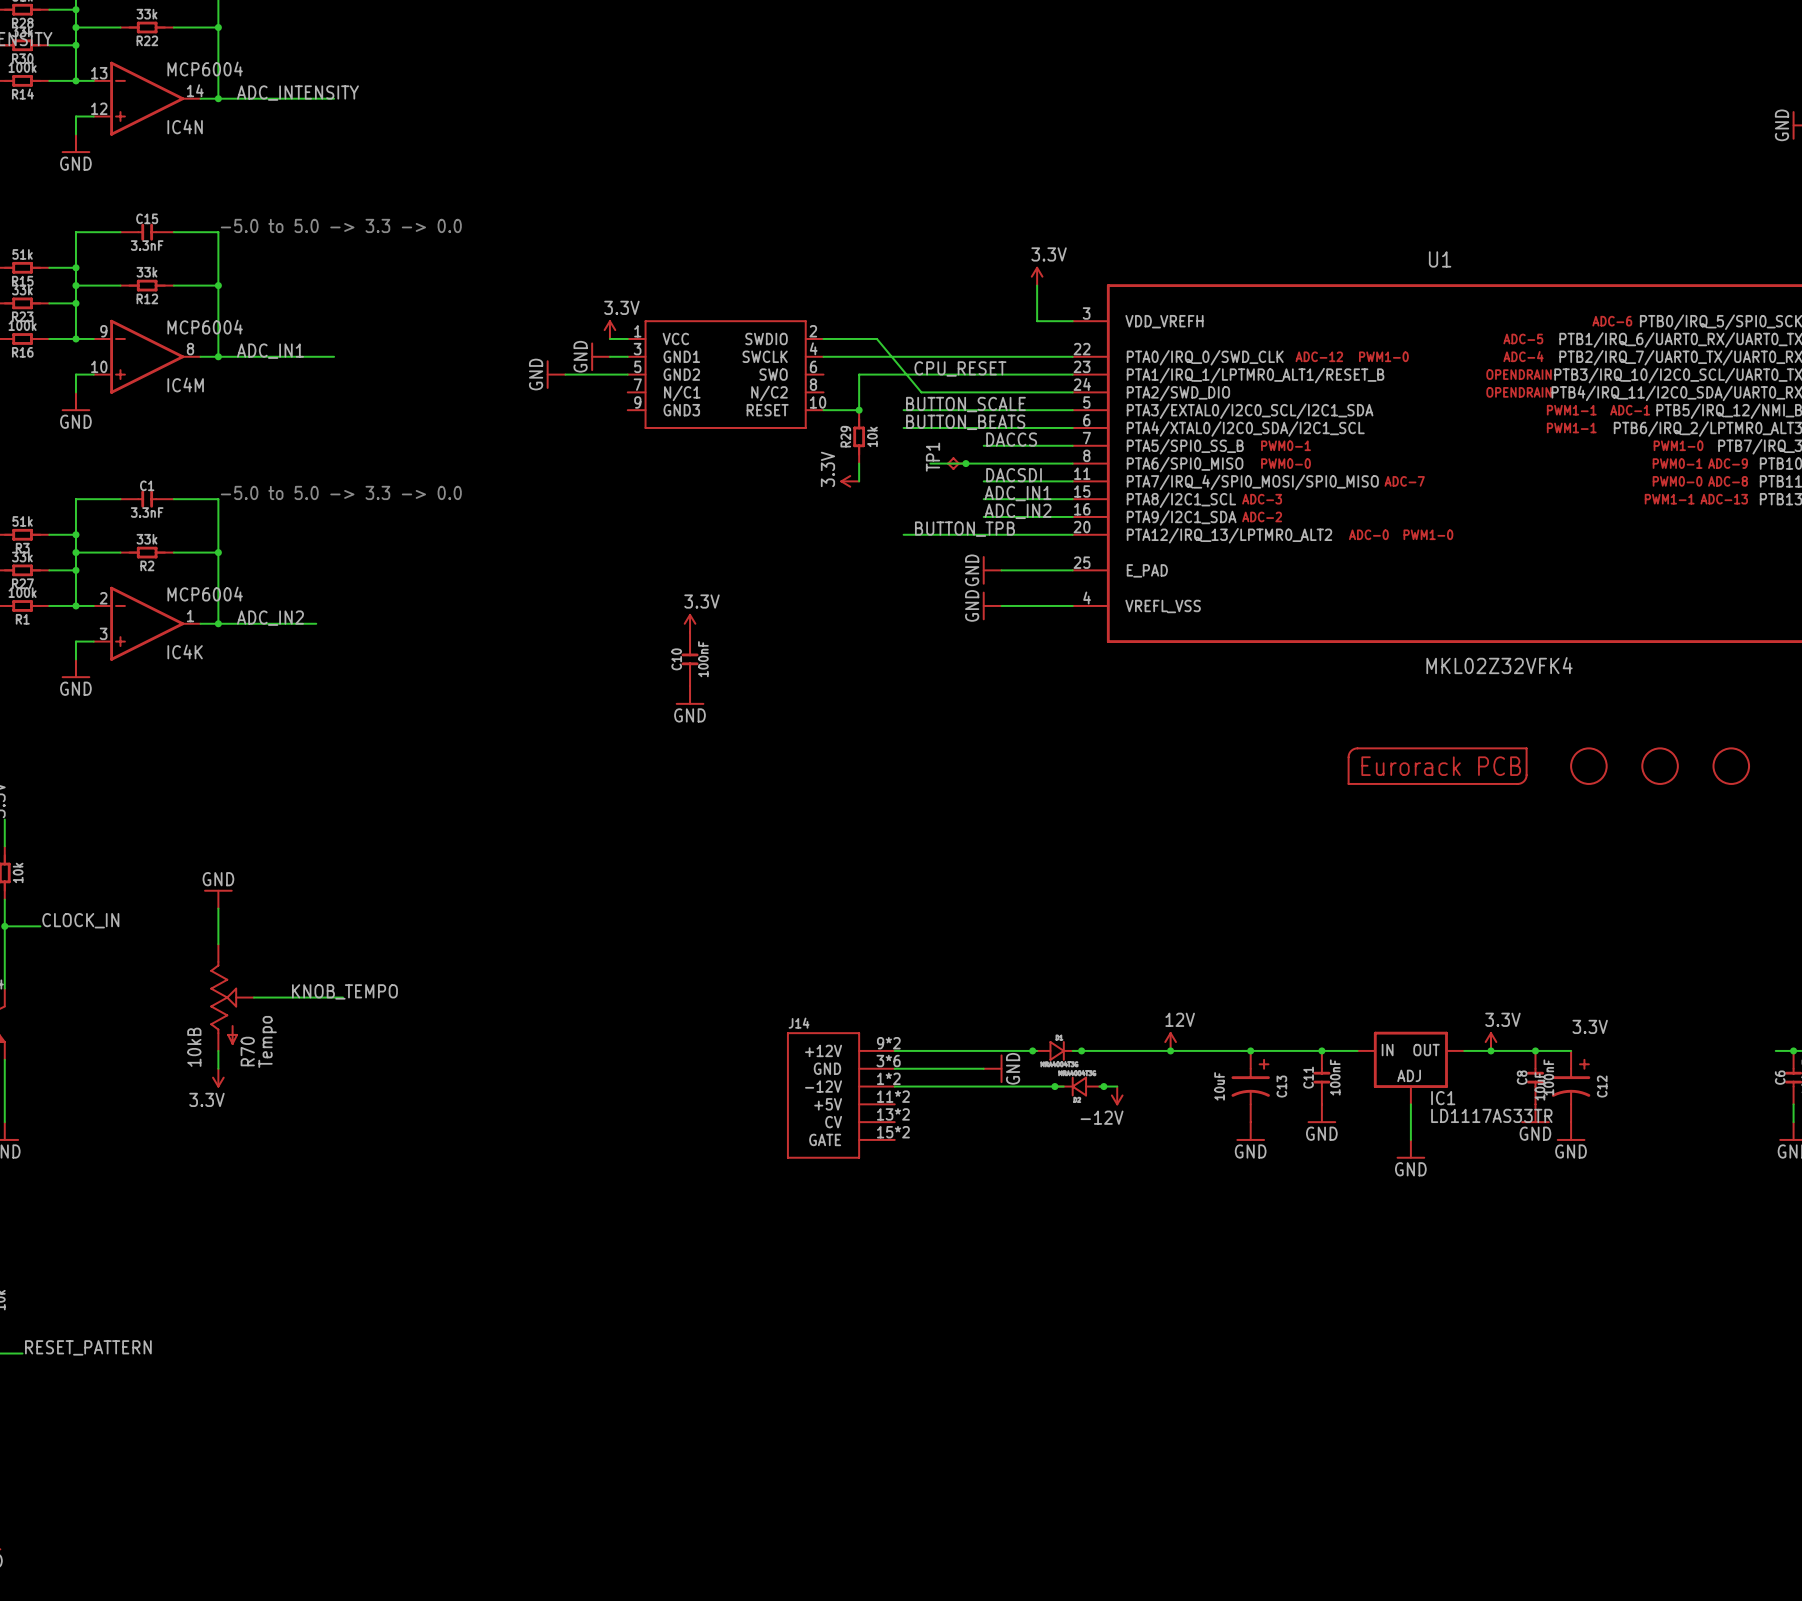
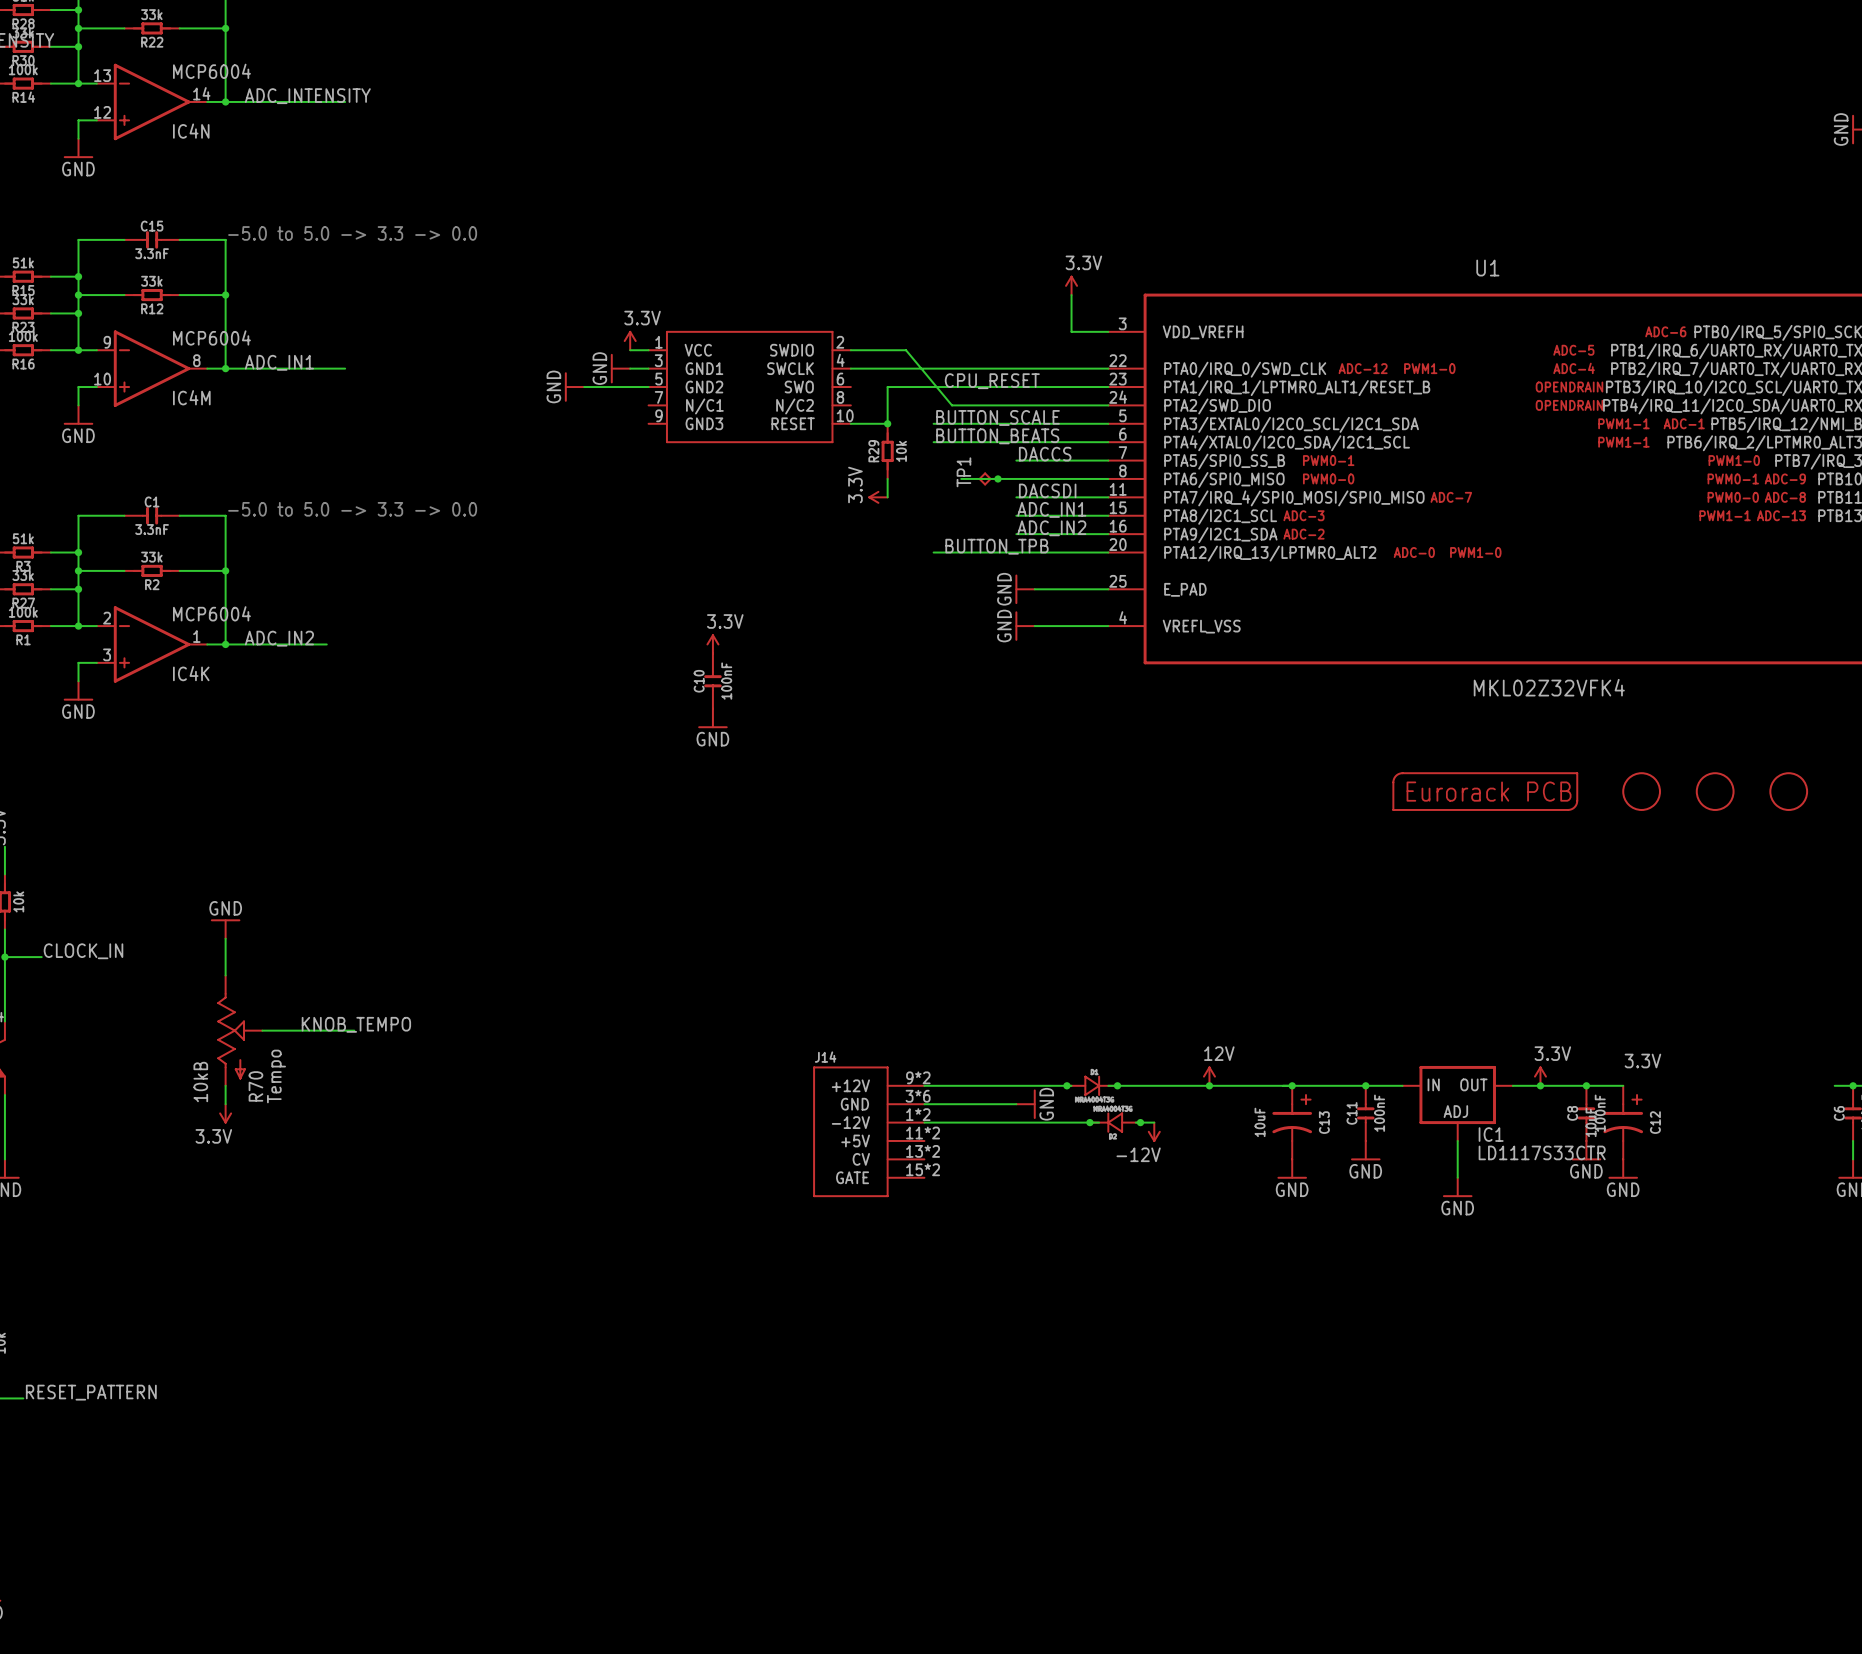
IC1 value: LD1117AS33TR (1491, 1115) -> LD1117S33CTR (1542, 1152)

